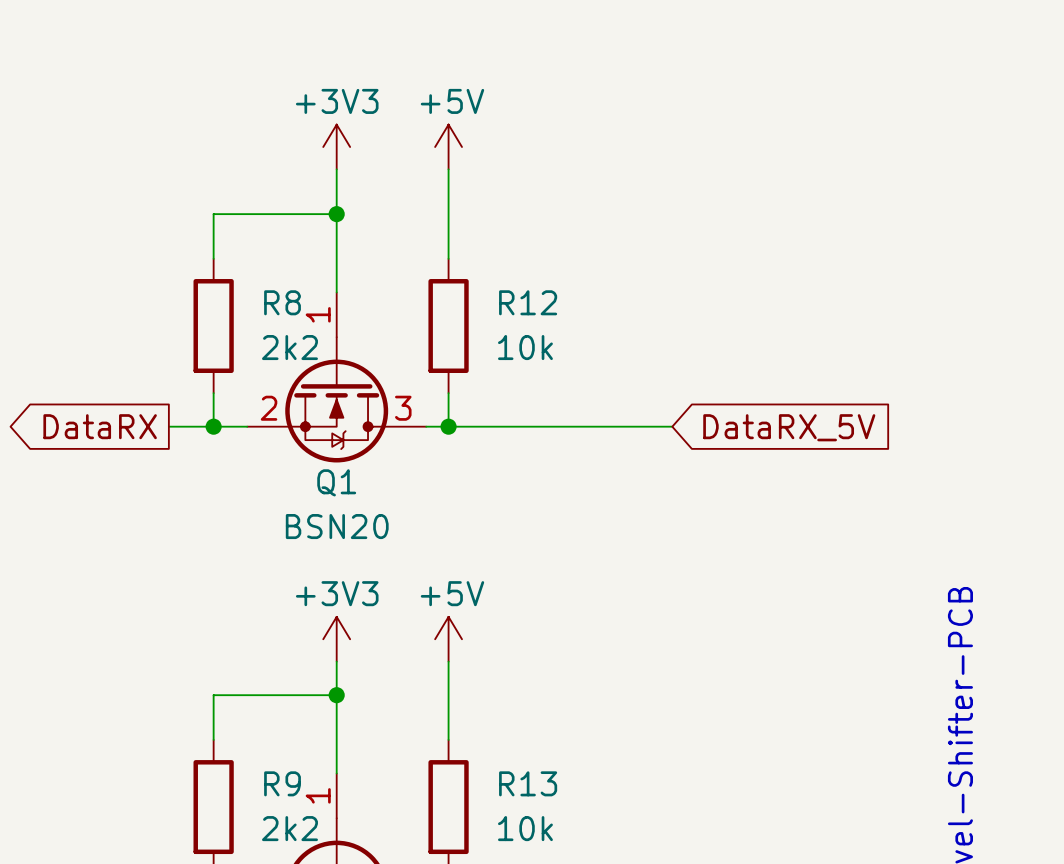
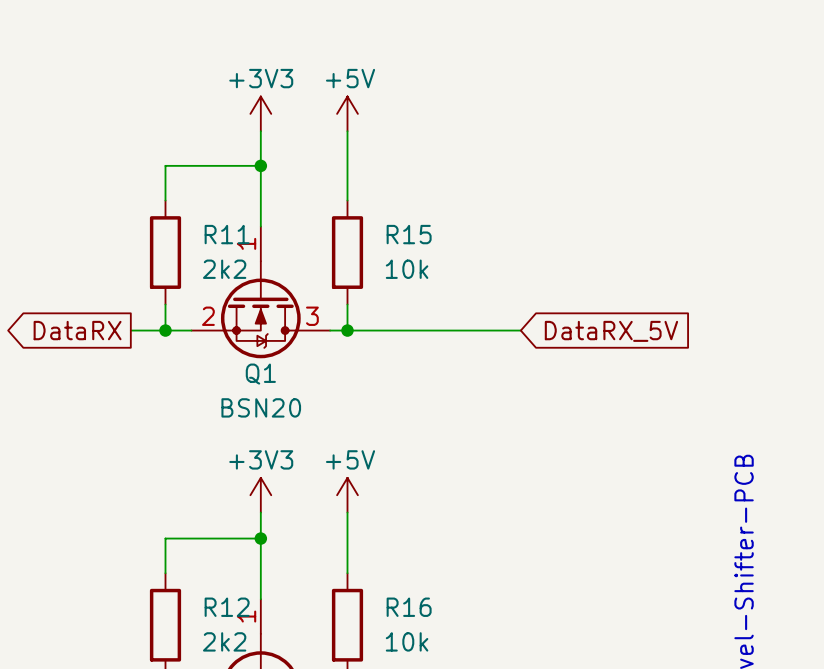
R8 name: R8 (282, 302) -> R11 (227, 234)
R12 name: R12 (528, 302) -> R15 (409, 234)
R9 name: R9 (282, 783) -> R12 (227, 607)
R13 name: R13 (528, 783) -> R16 (409, 607)

